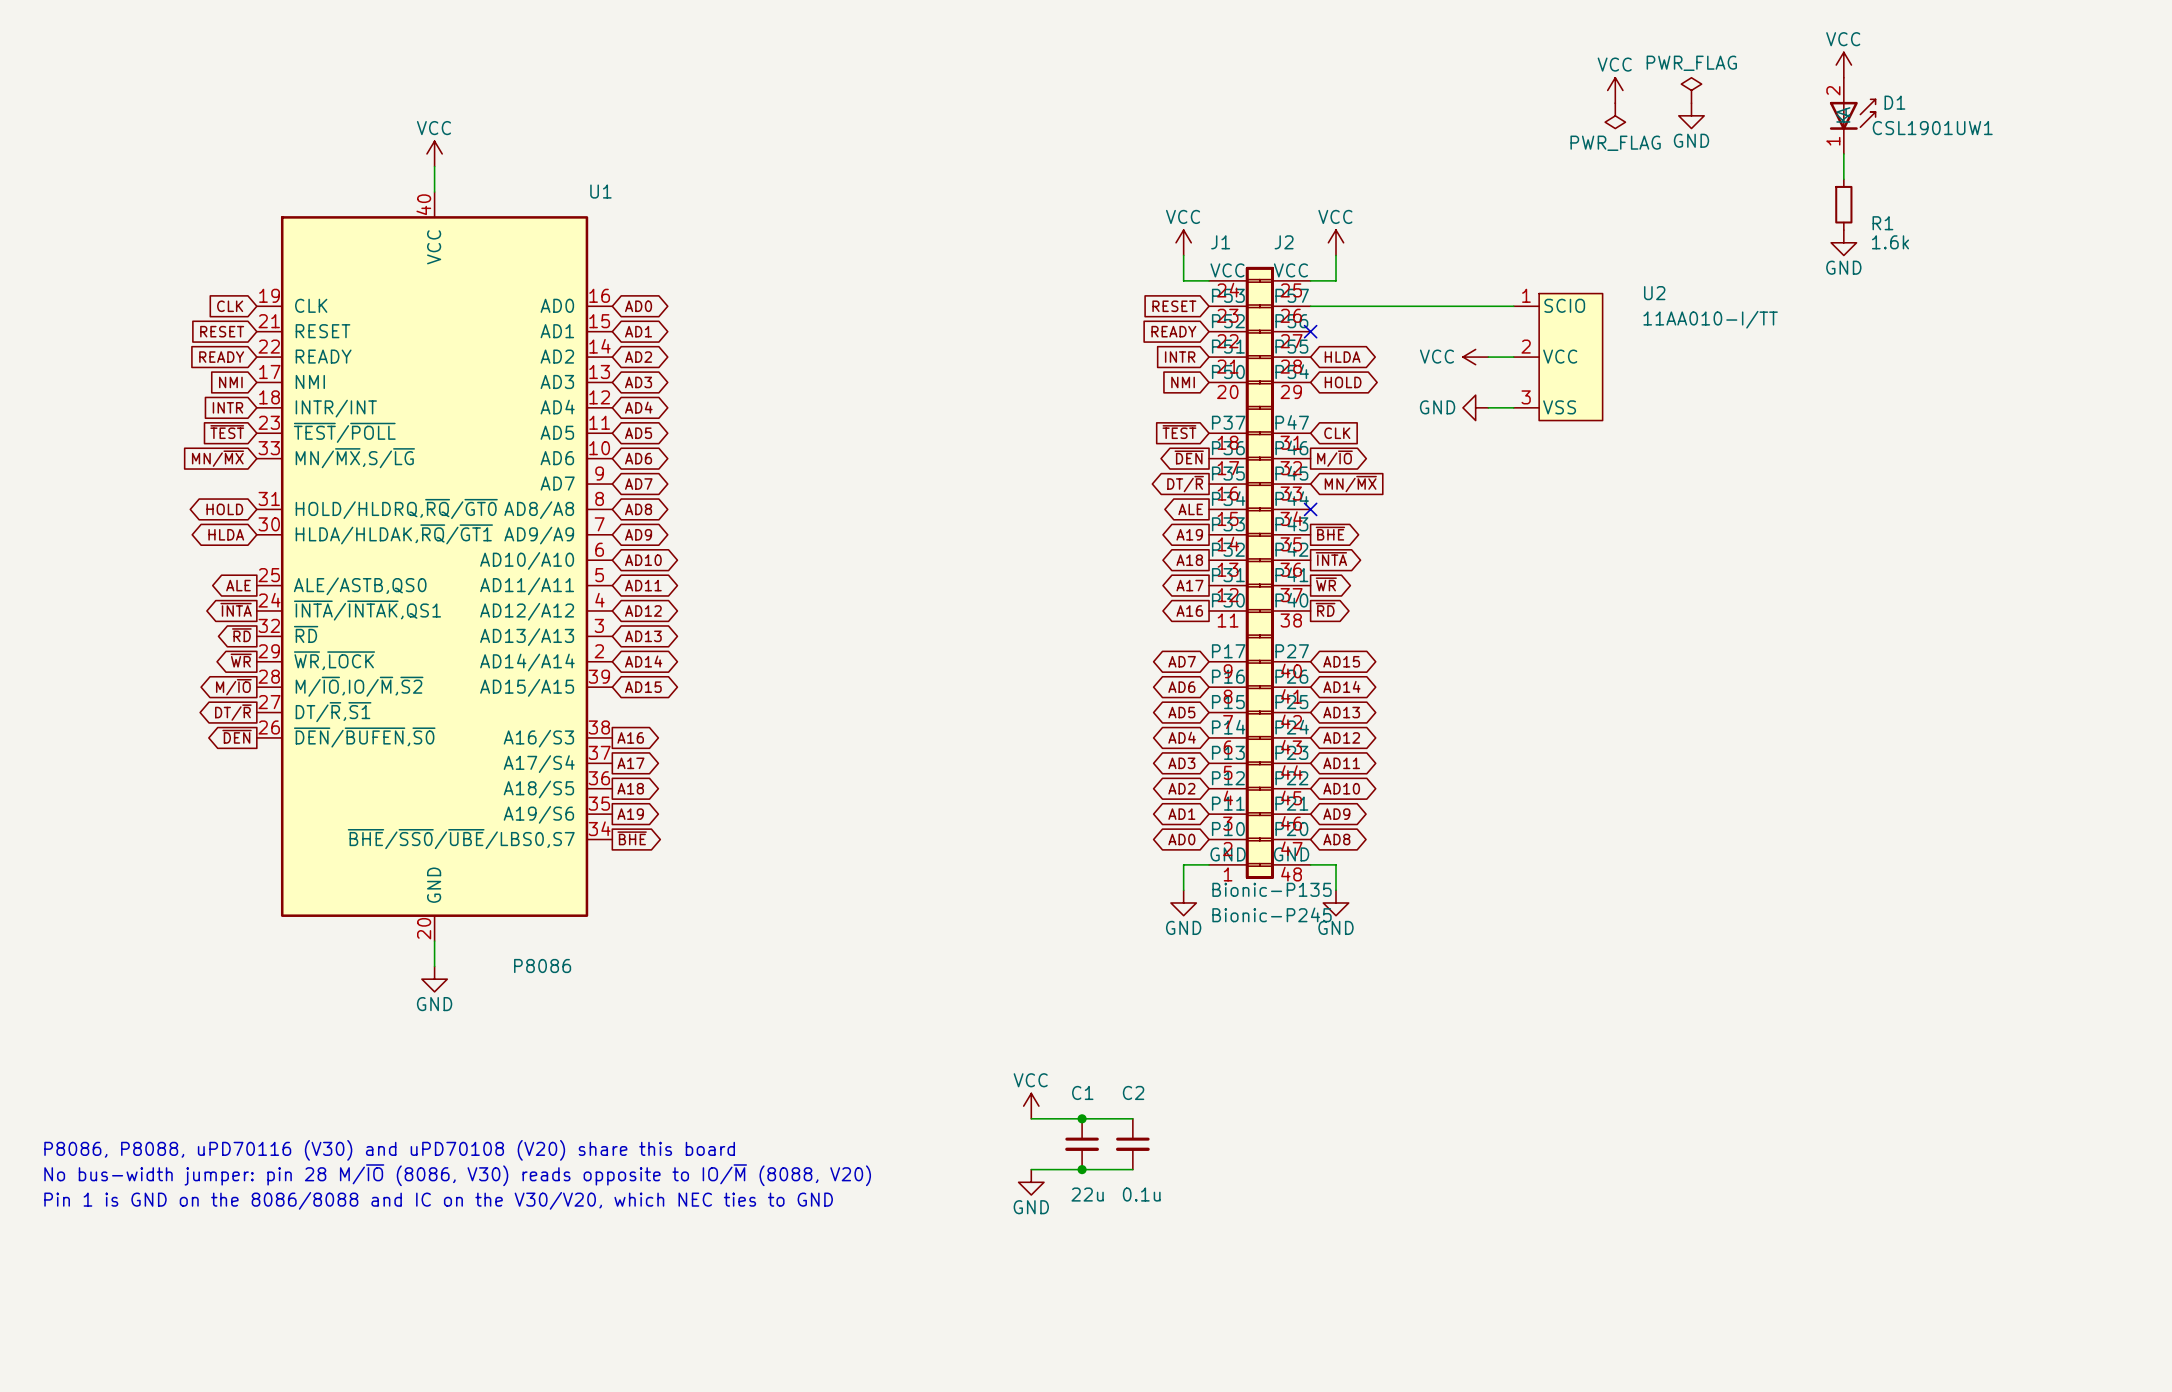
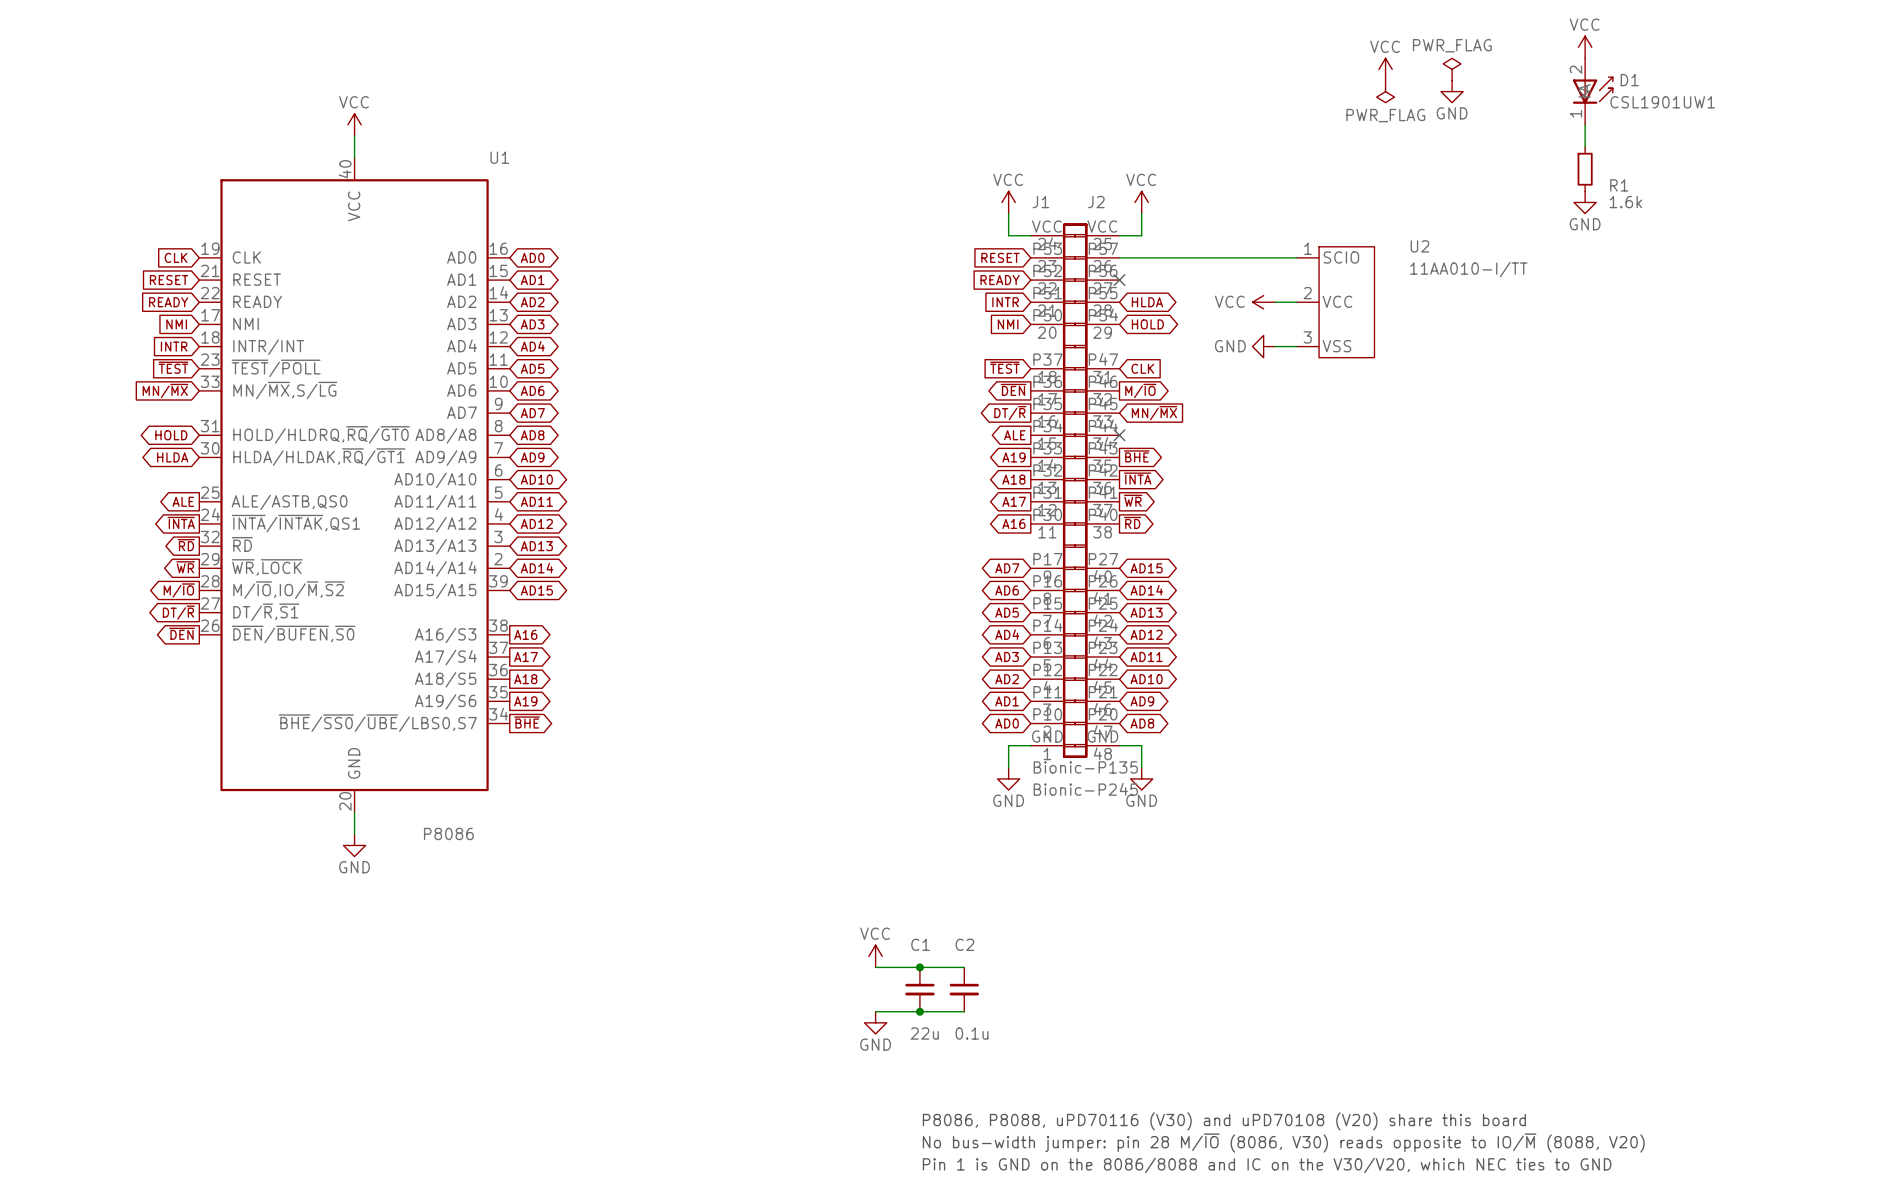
text: P8086, P8088, uPD70116 (V30) and uPD70108 (V20) share this board (389, 1150) -> none
text: No bus-width jumper: pin 28 M/~{IO} (8086, V30) reads opposite to IO/~{M} (8088, V20) (457, 1175) -> none
text: Pin 1 is GND on the 8086/8088 and IC on the V30/V20, which NEC ties to GND (438, 1200) -> none
text: none -> P8086, P8088, uPD70116 (V30) and uPD70108 (V20) share this board (1224, 1121)
text: none -> No bus-width jumper: pin 28 M/~{IO} (8086, V30) reads opposite to IO/~{M} (8088, V20) (1283, 1143)
text: none -> Pin 1 is GND on the 8086/8088 and IC on the V30/V20, which NEC ties to GND (1267, 1165)

